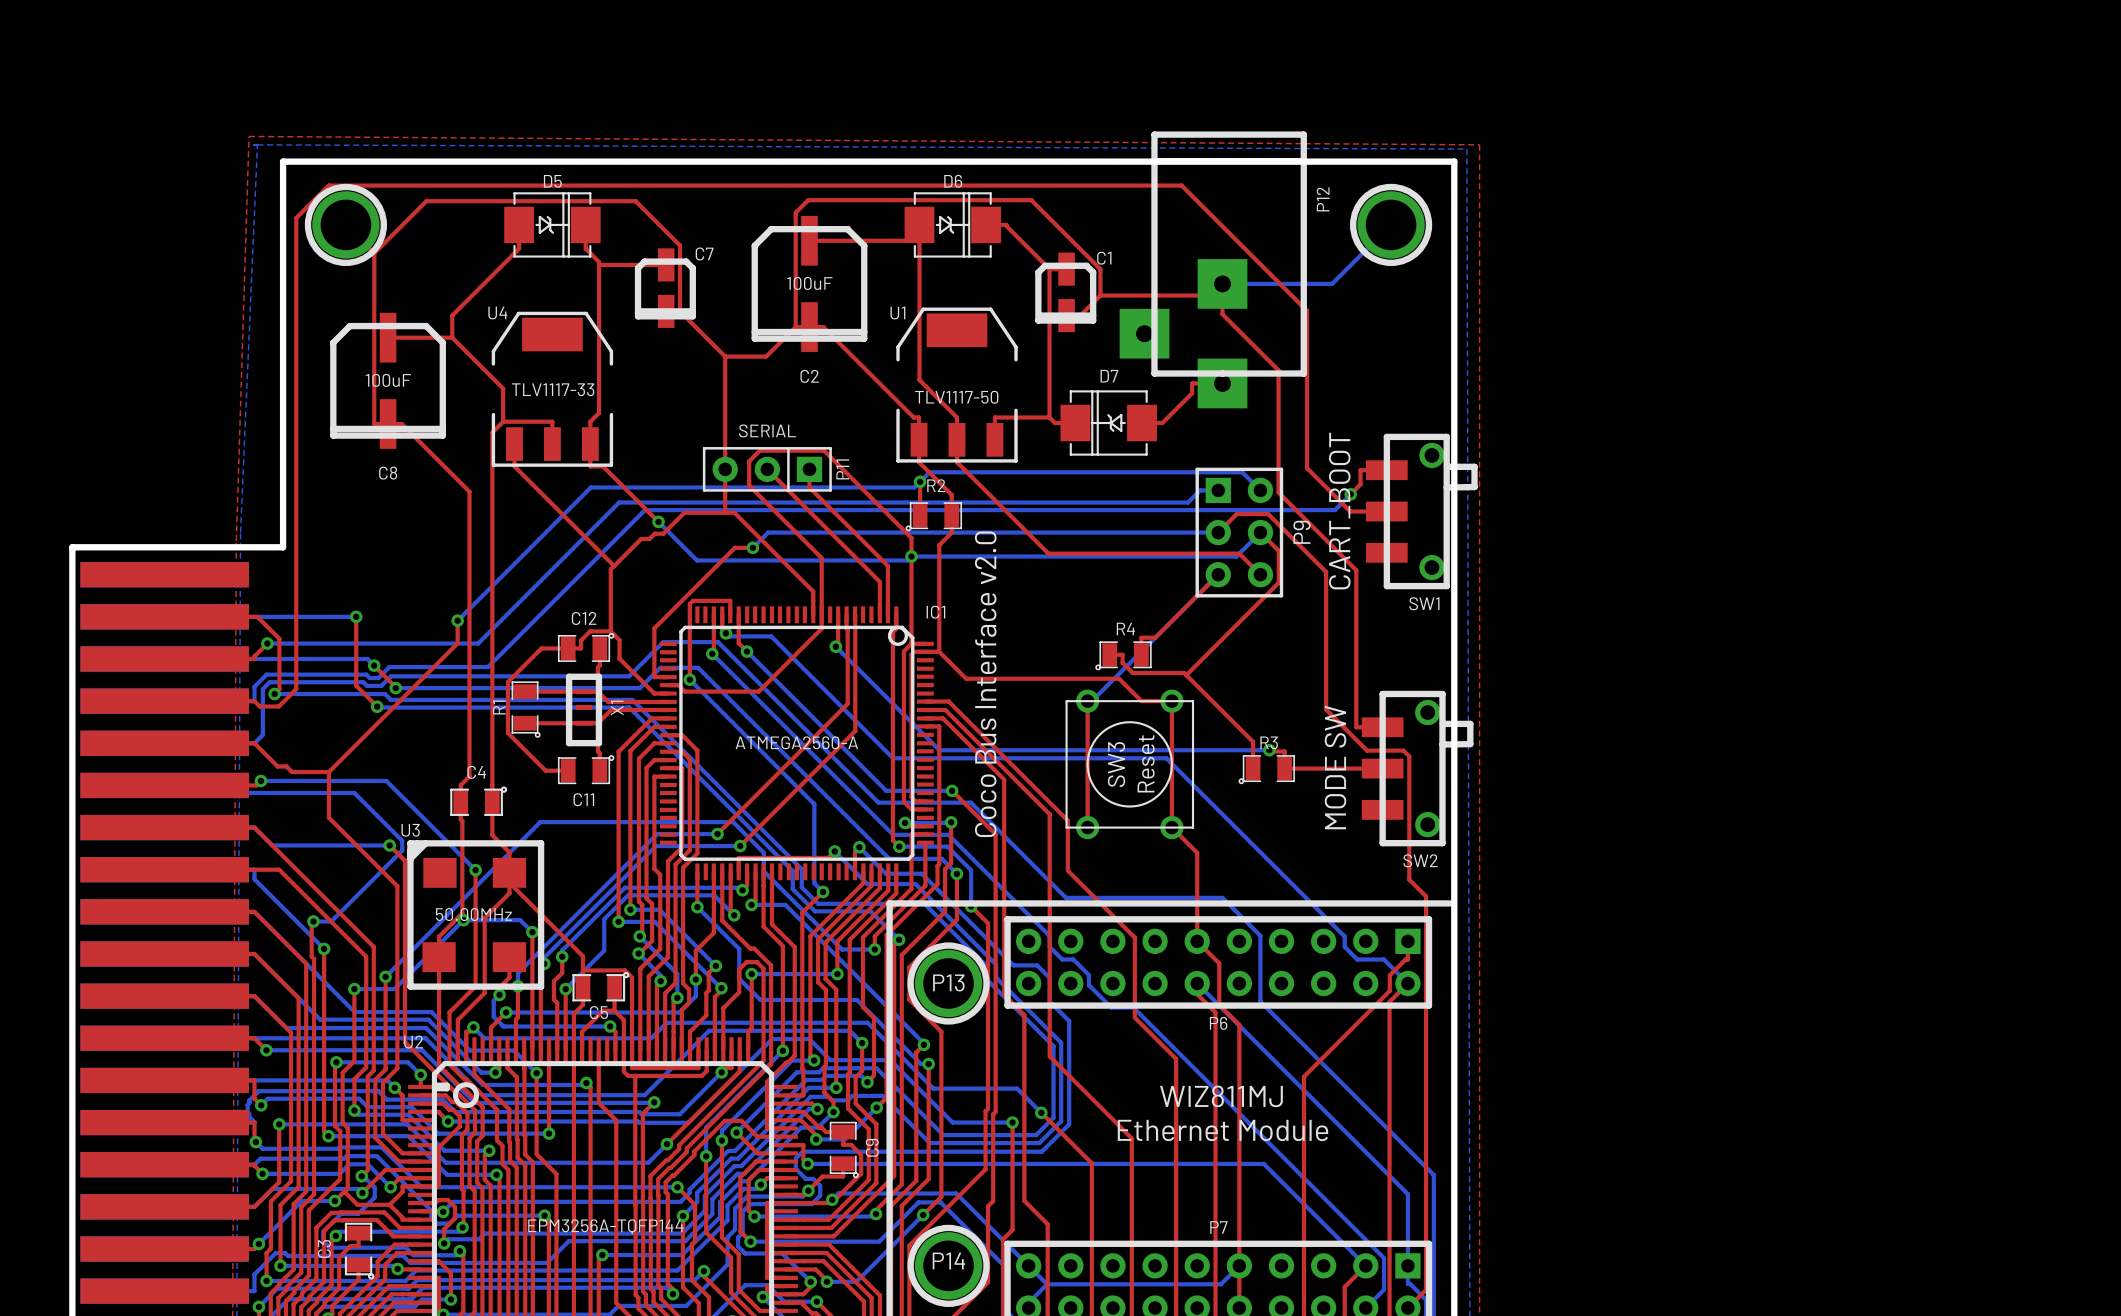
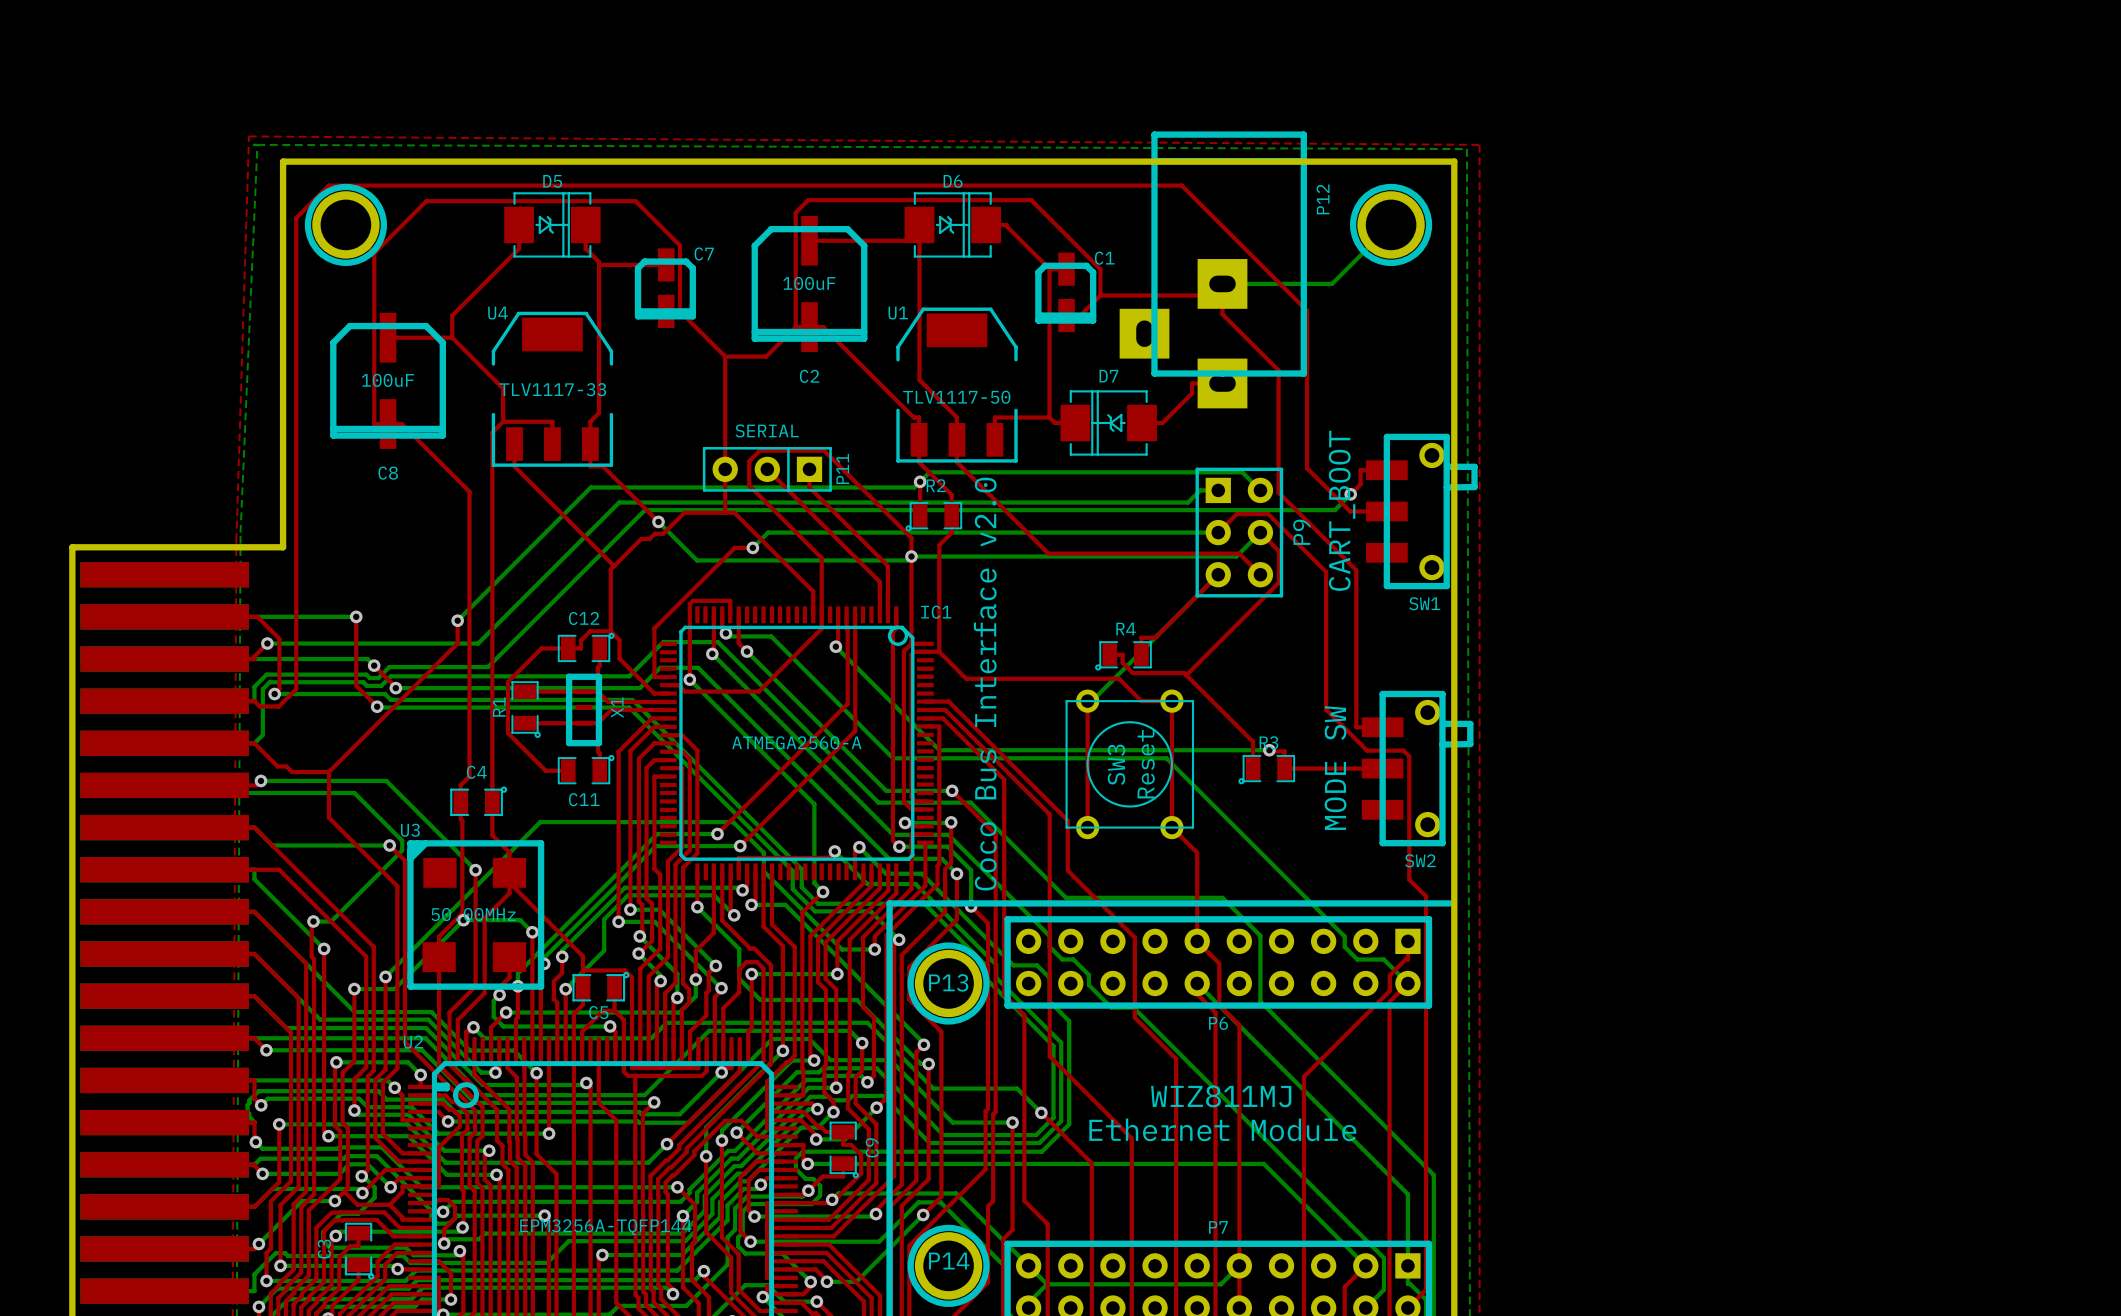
P12 footprint: [1119, 131, 1307, 409] -> [1119, 131, 1307, 409]

